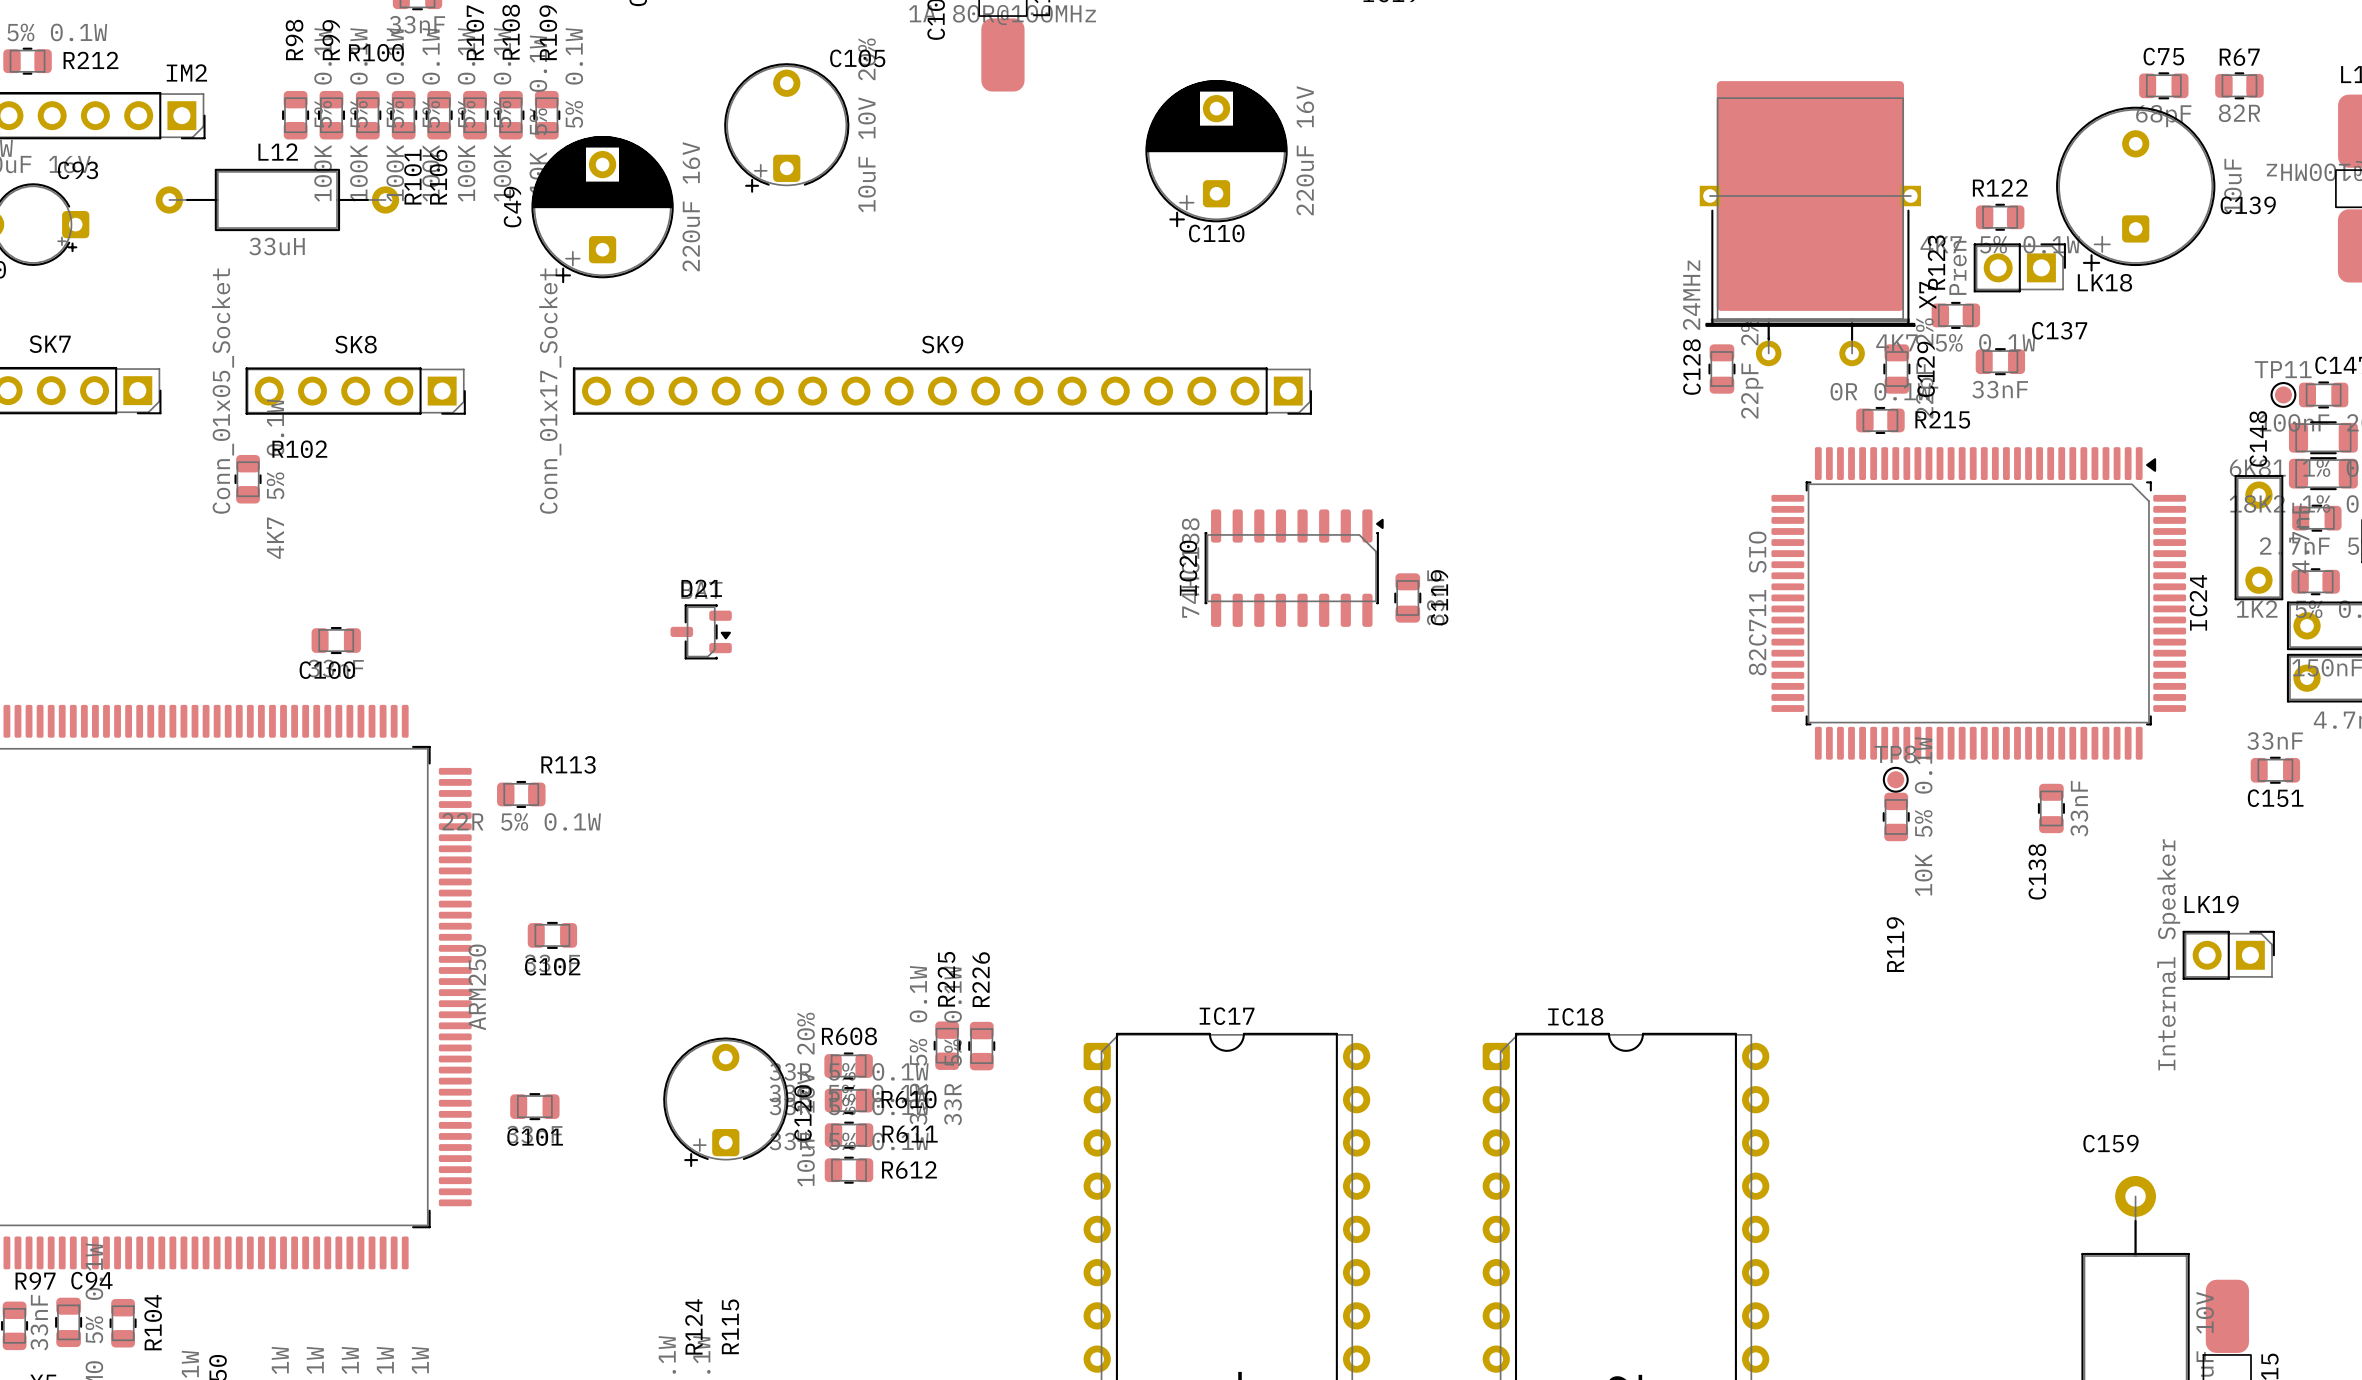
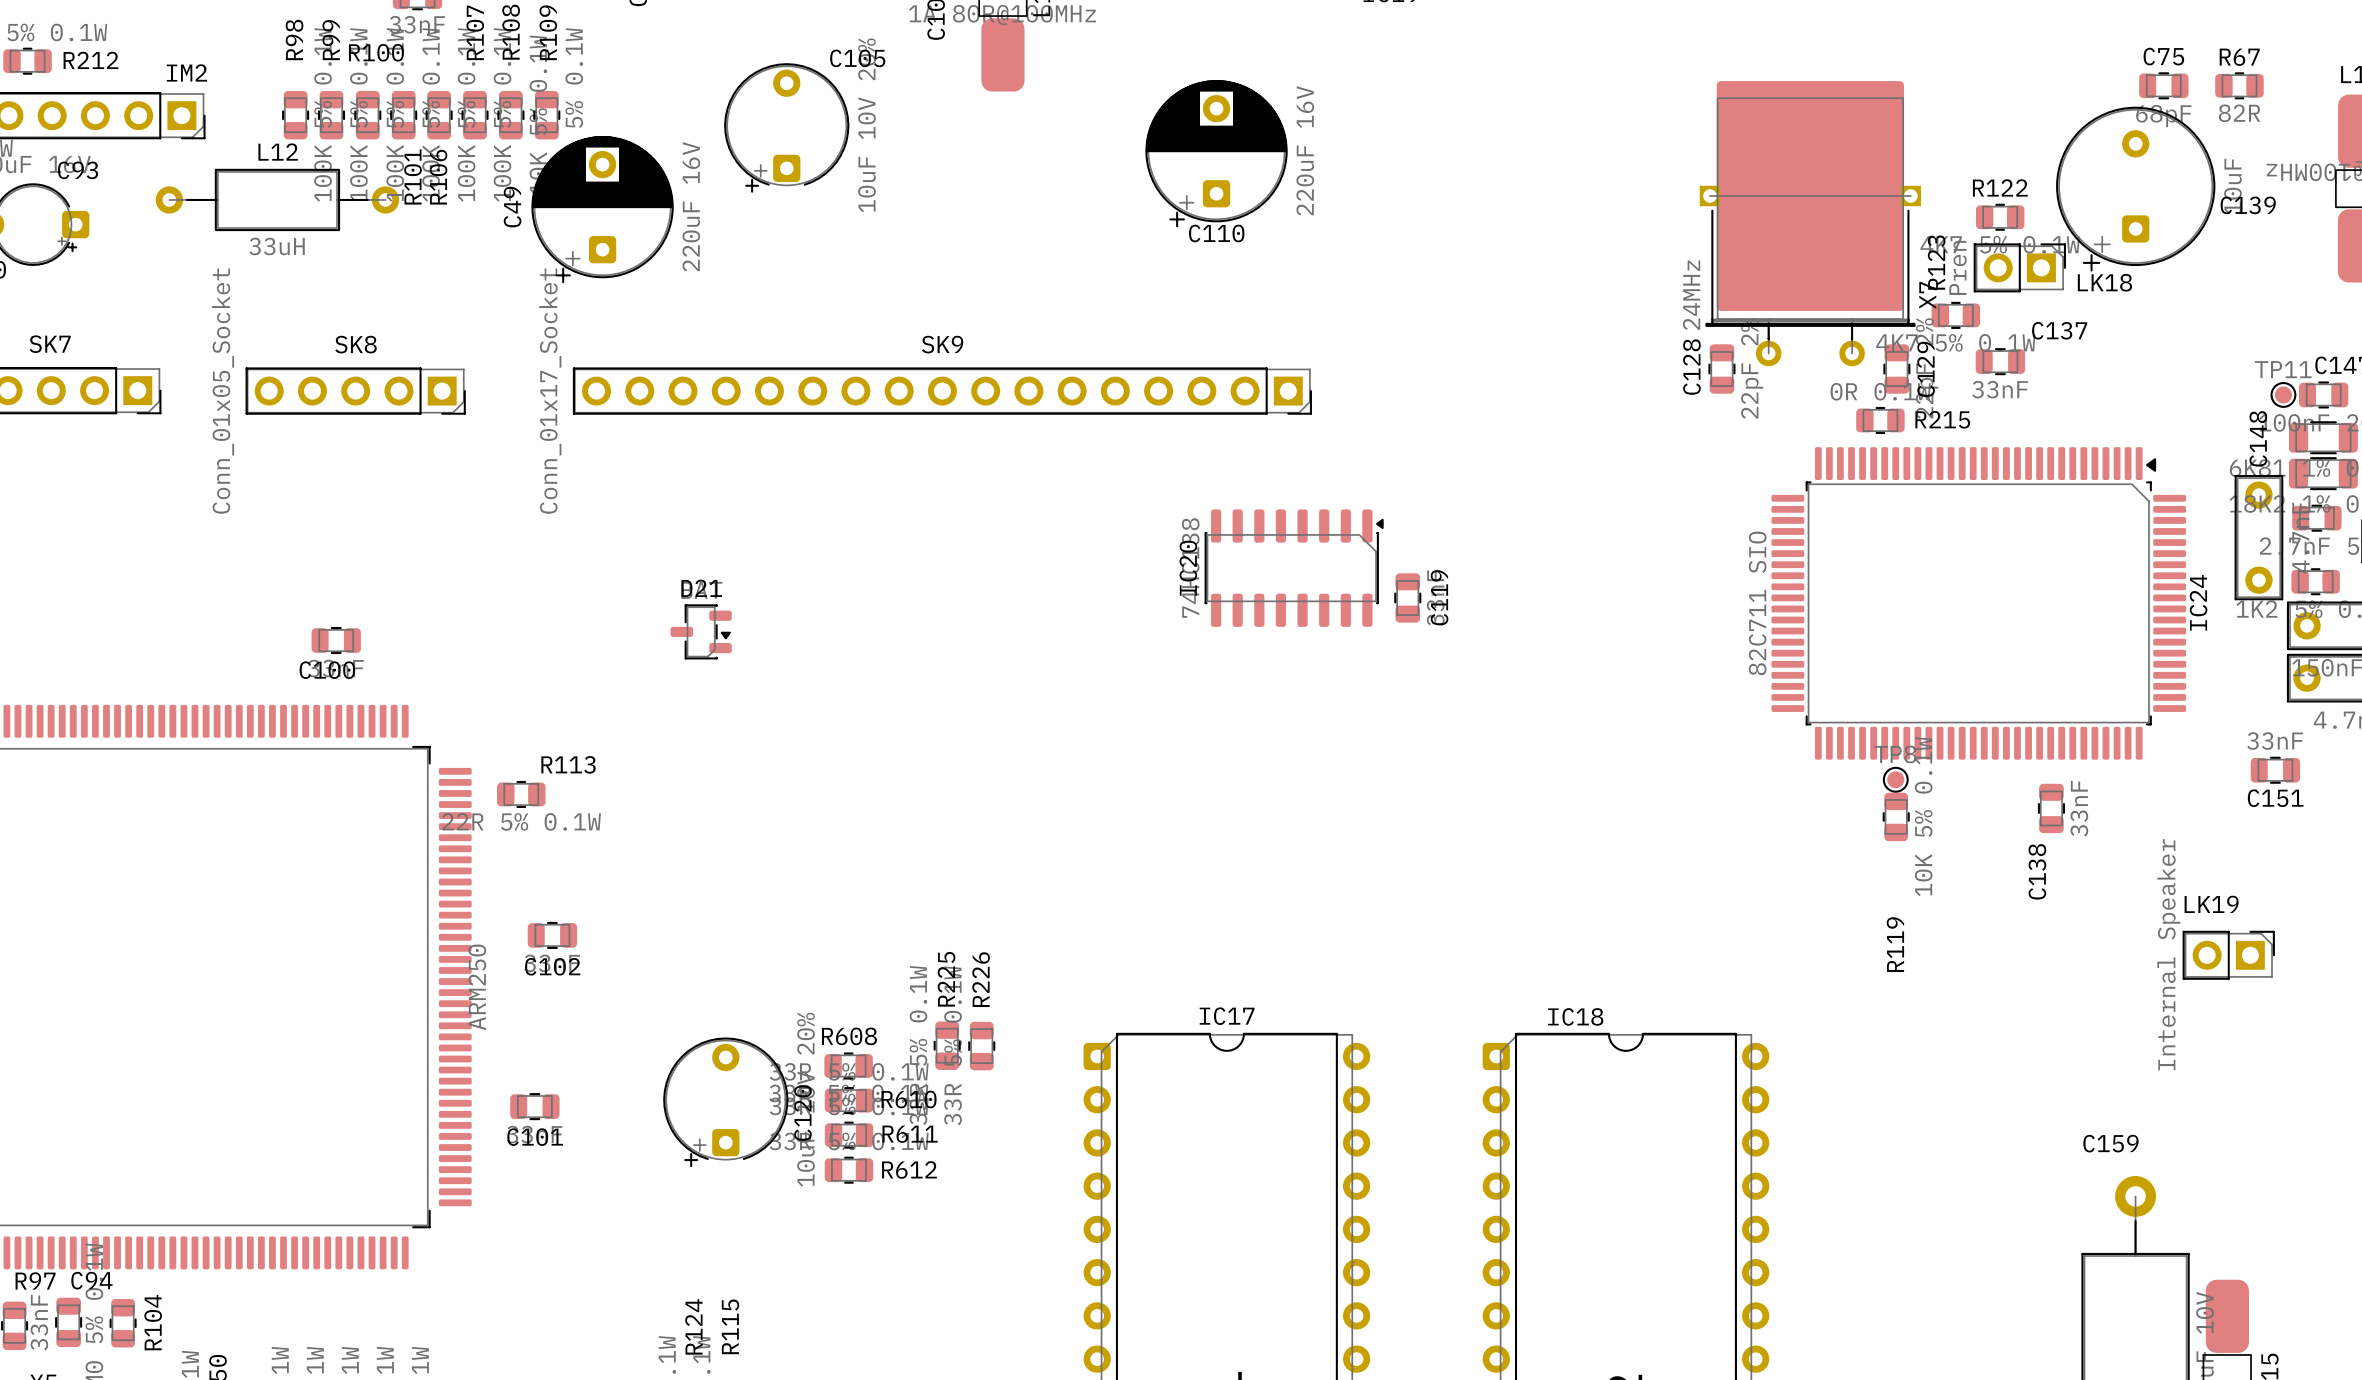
R102: 4K7 5% 0.1W (248, 479) -> none

